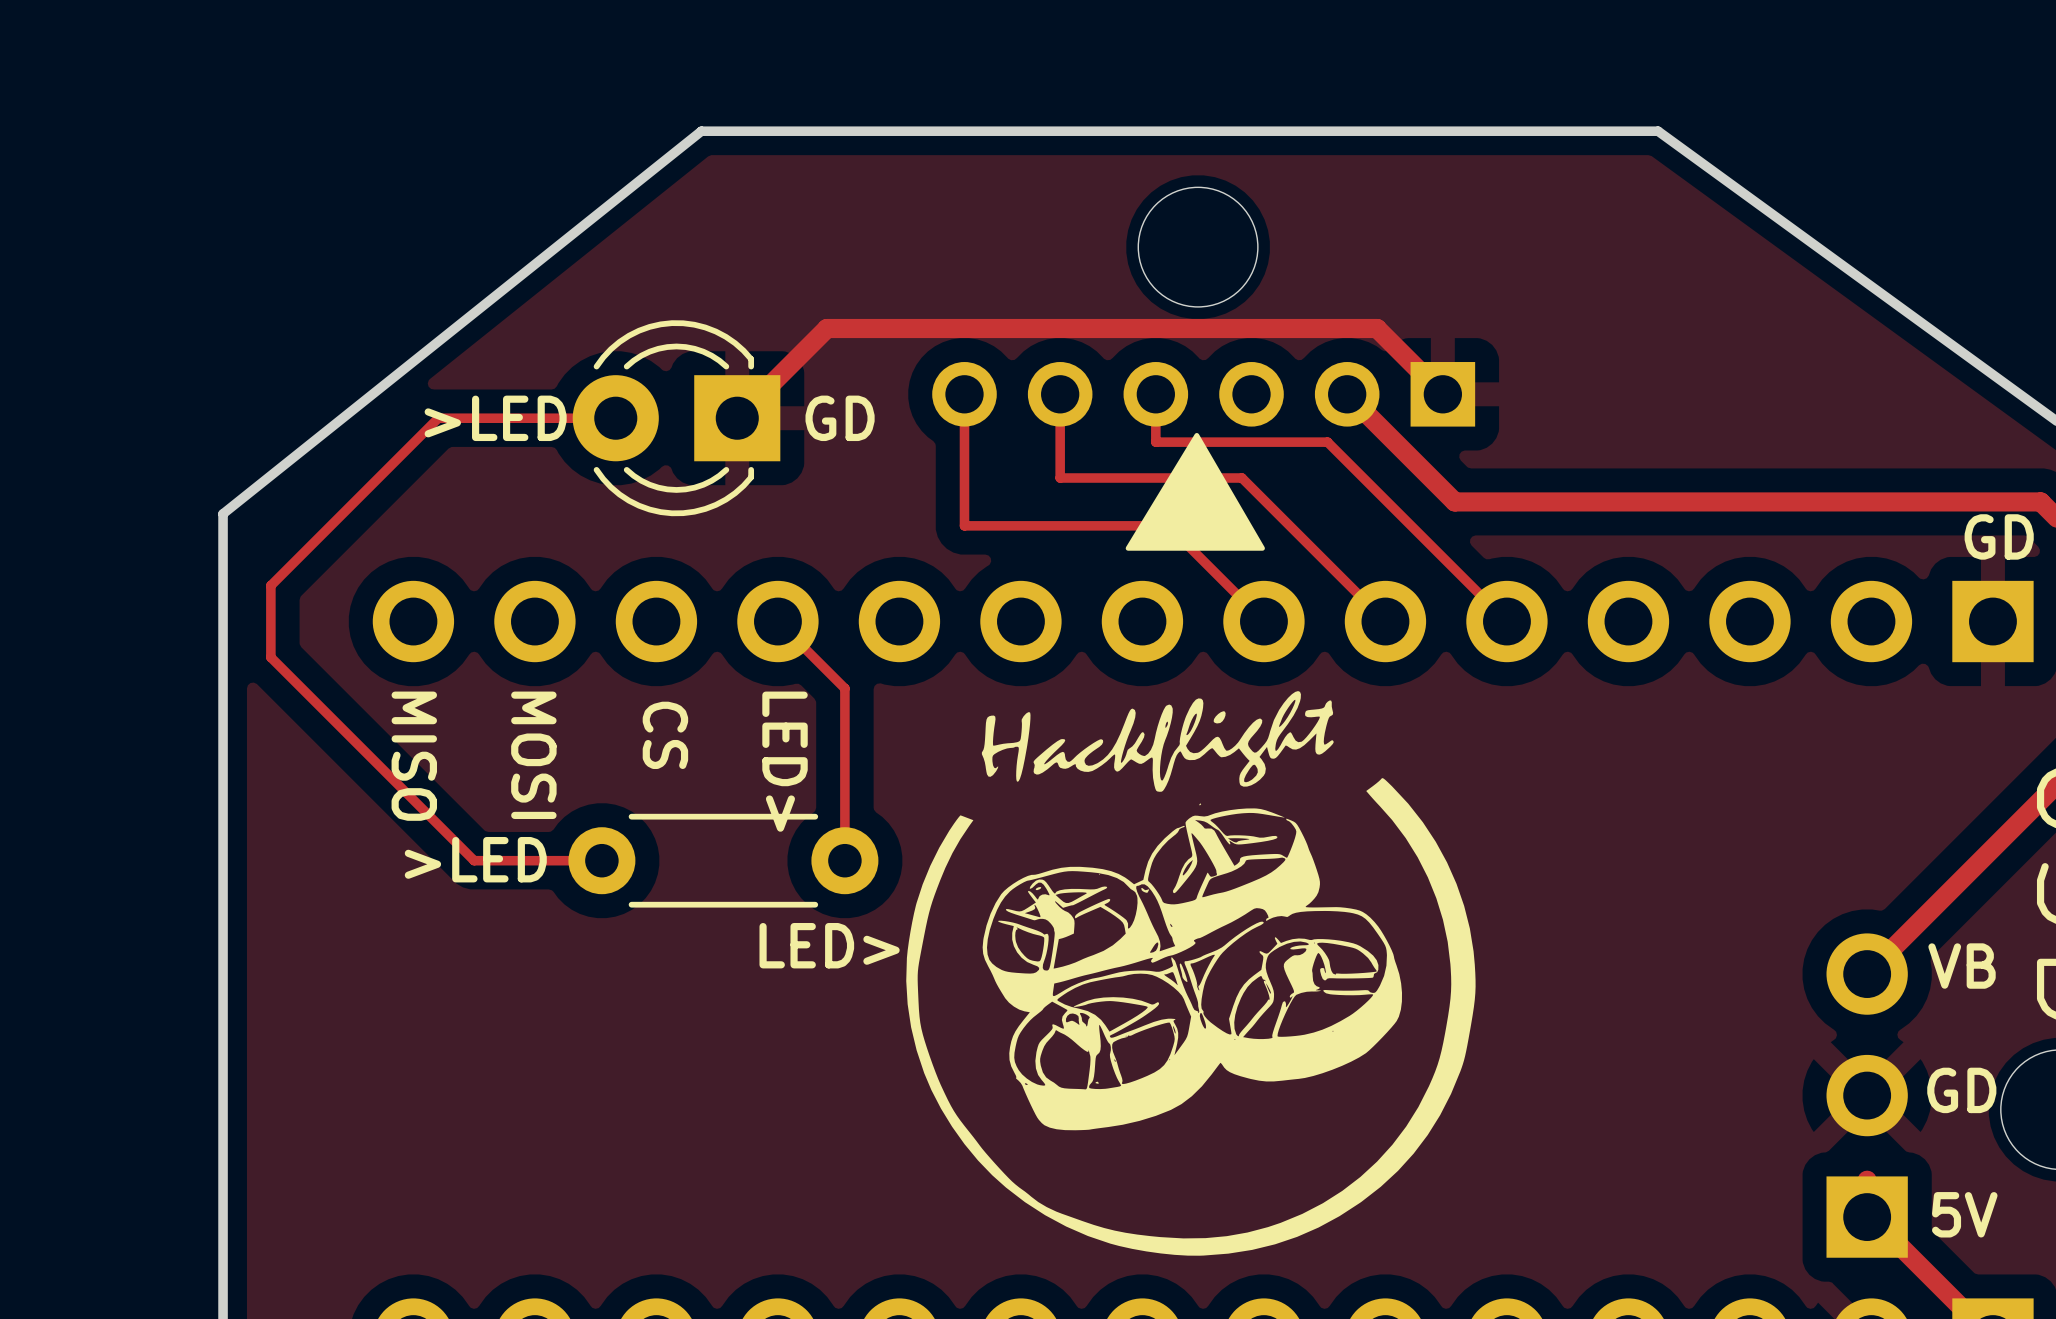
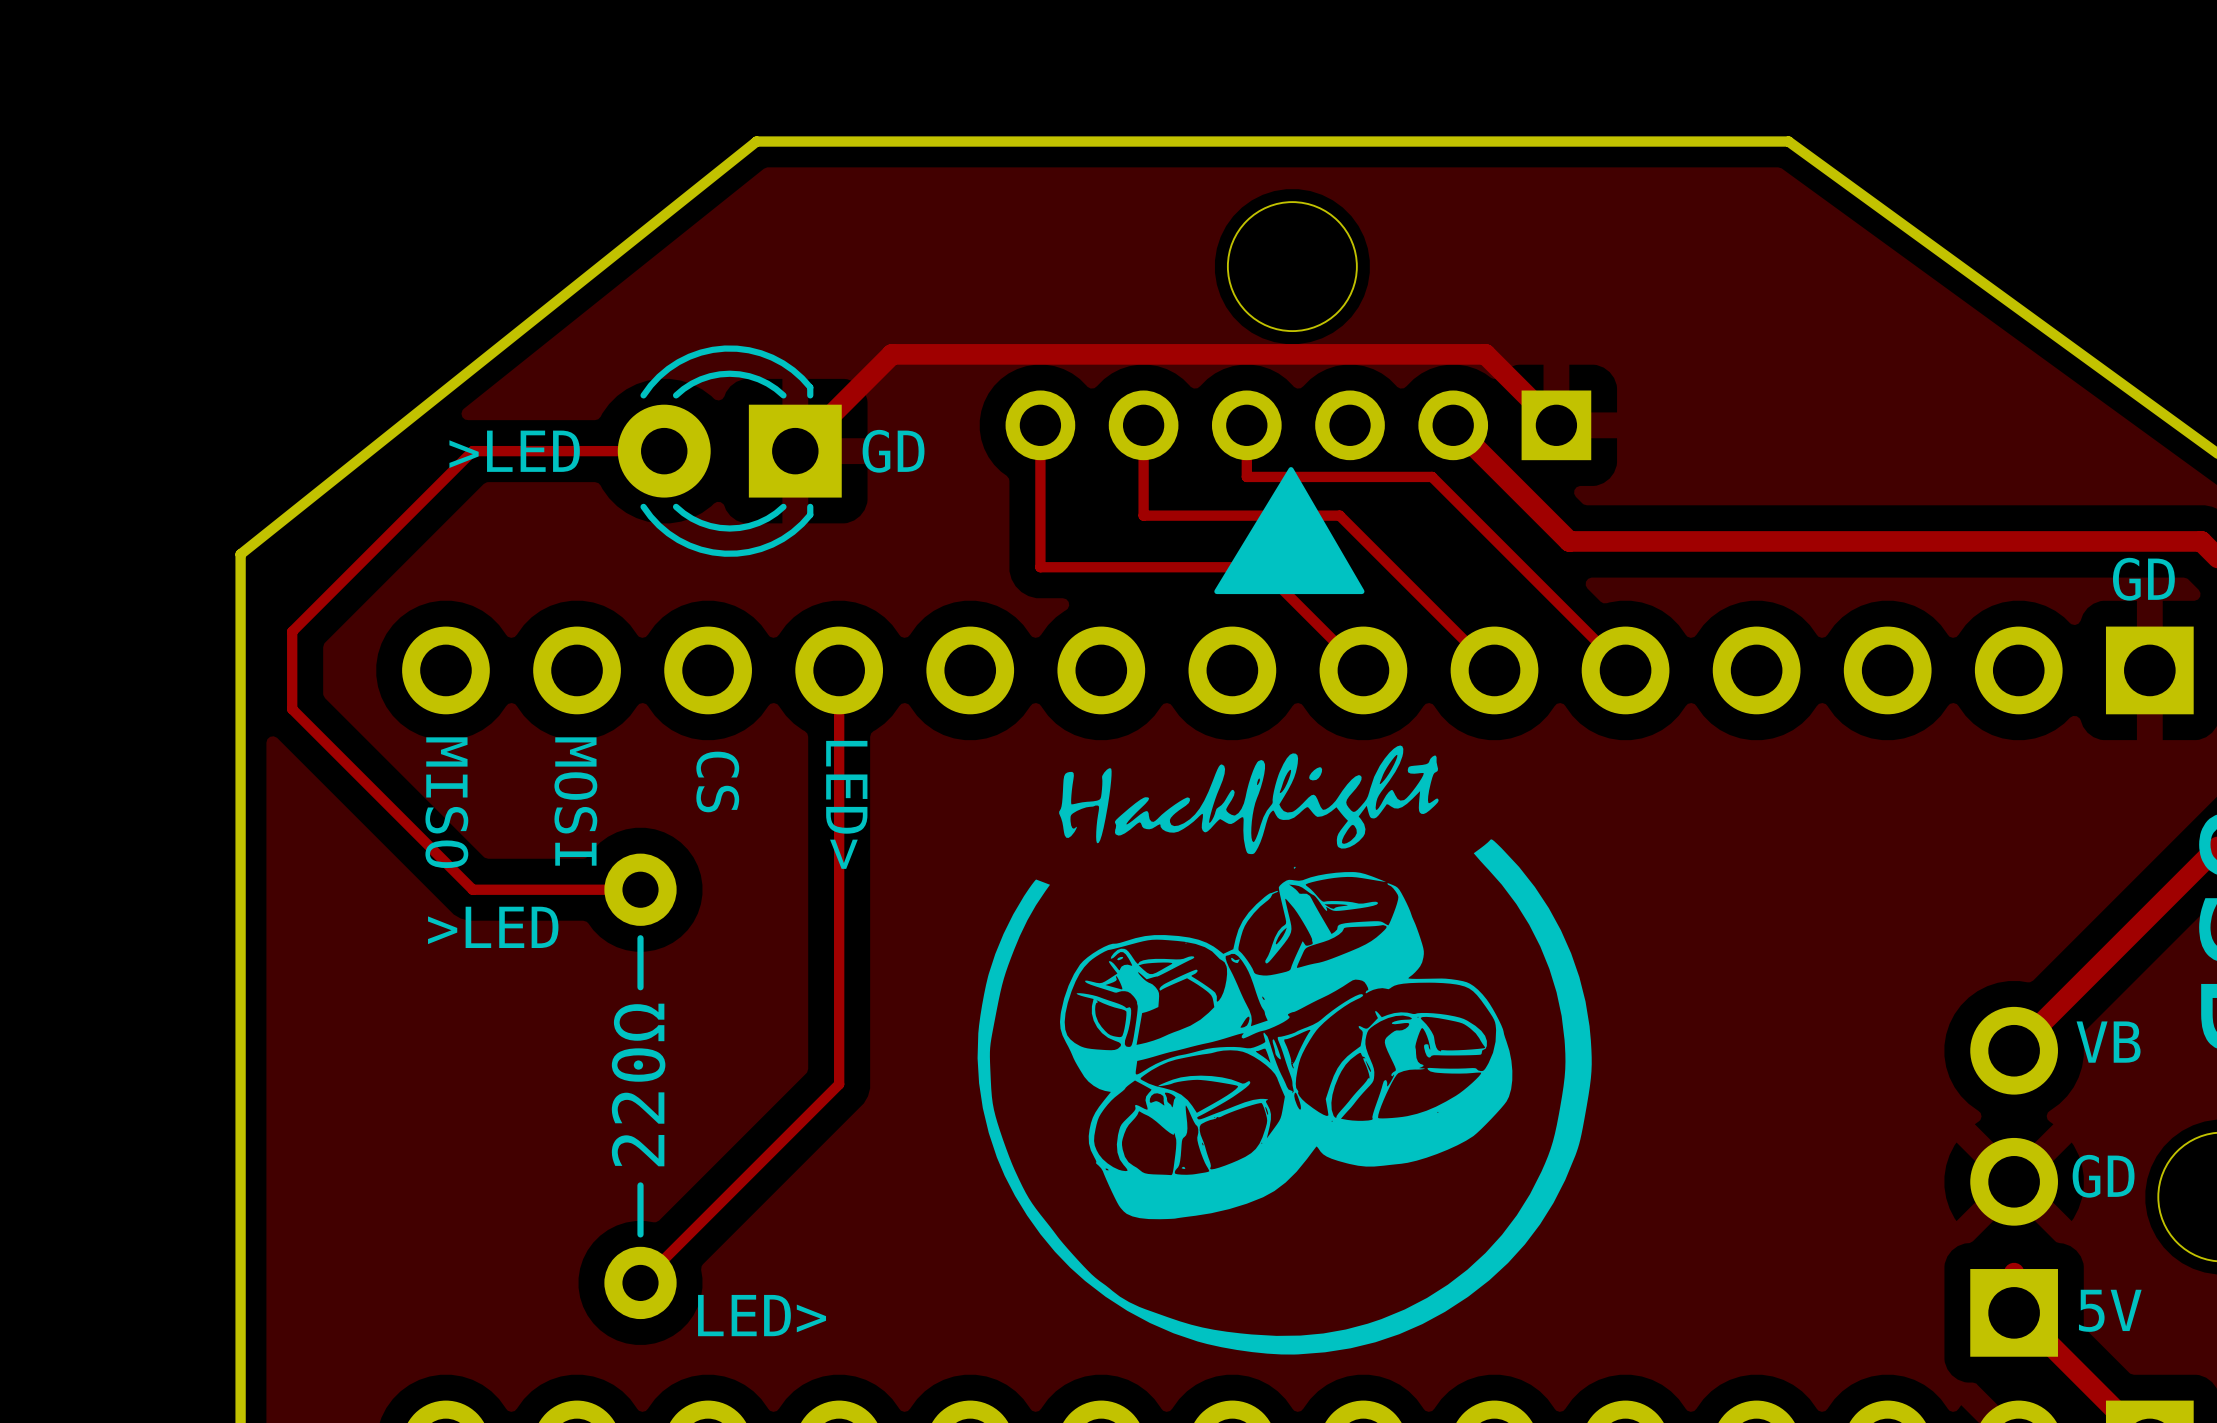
track: (777, 621) (844, 688) (844, 860) -> (839, 670) (839, 1084) (640, 1282)
track: (438, 824) (474, 860) (601, 860) -> (472, 889) (640, 889)
part: (723, 860) -> none
text position: LED> (829, 945) -> LED> (762, 1315)
220Ω: none -> (640, 1086)

